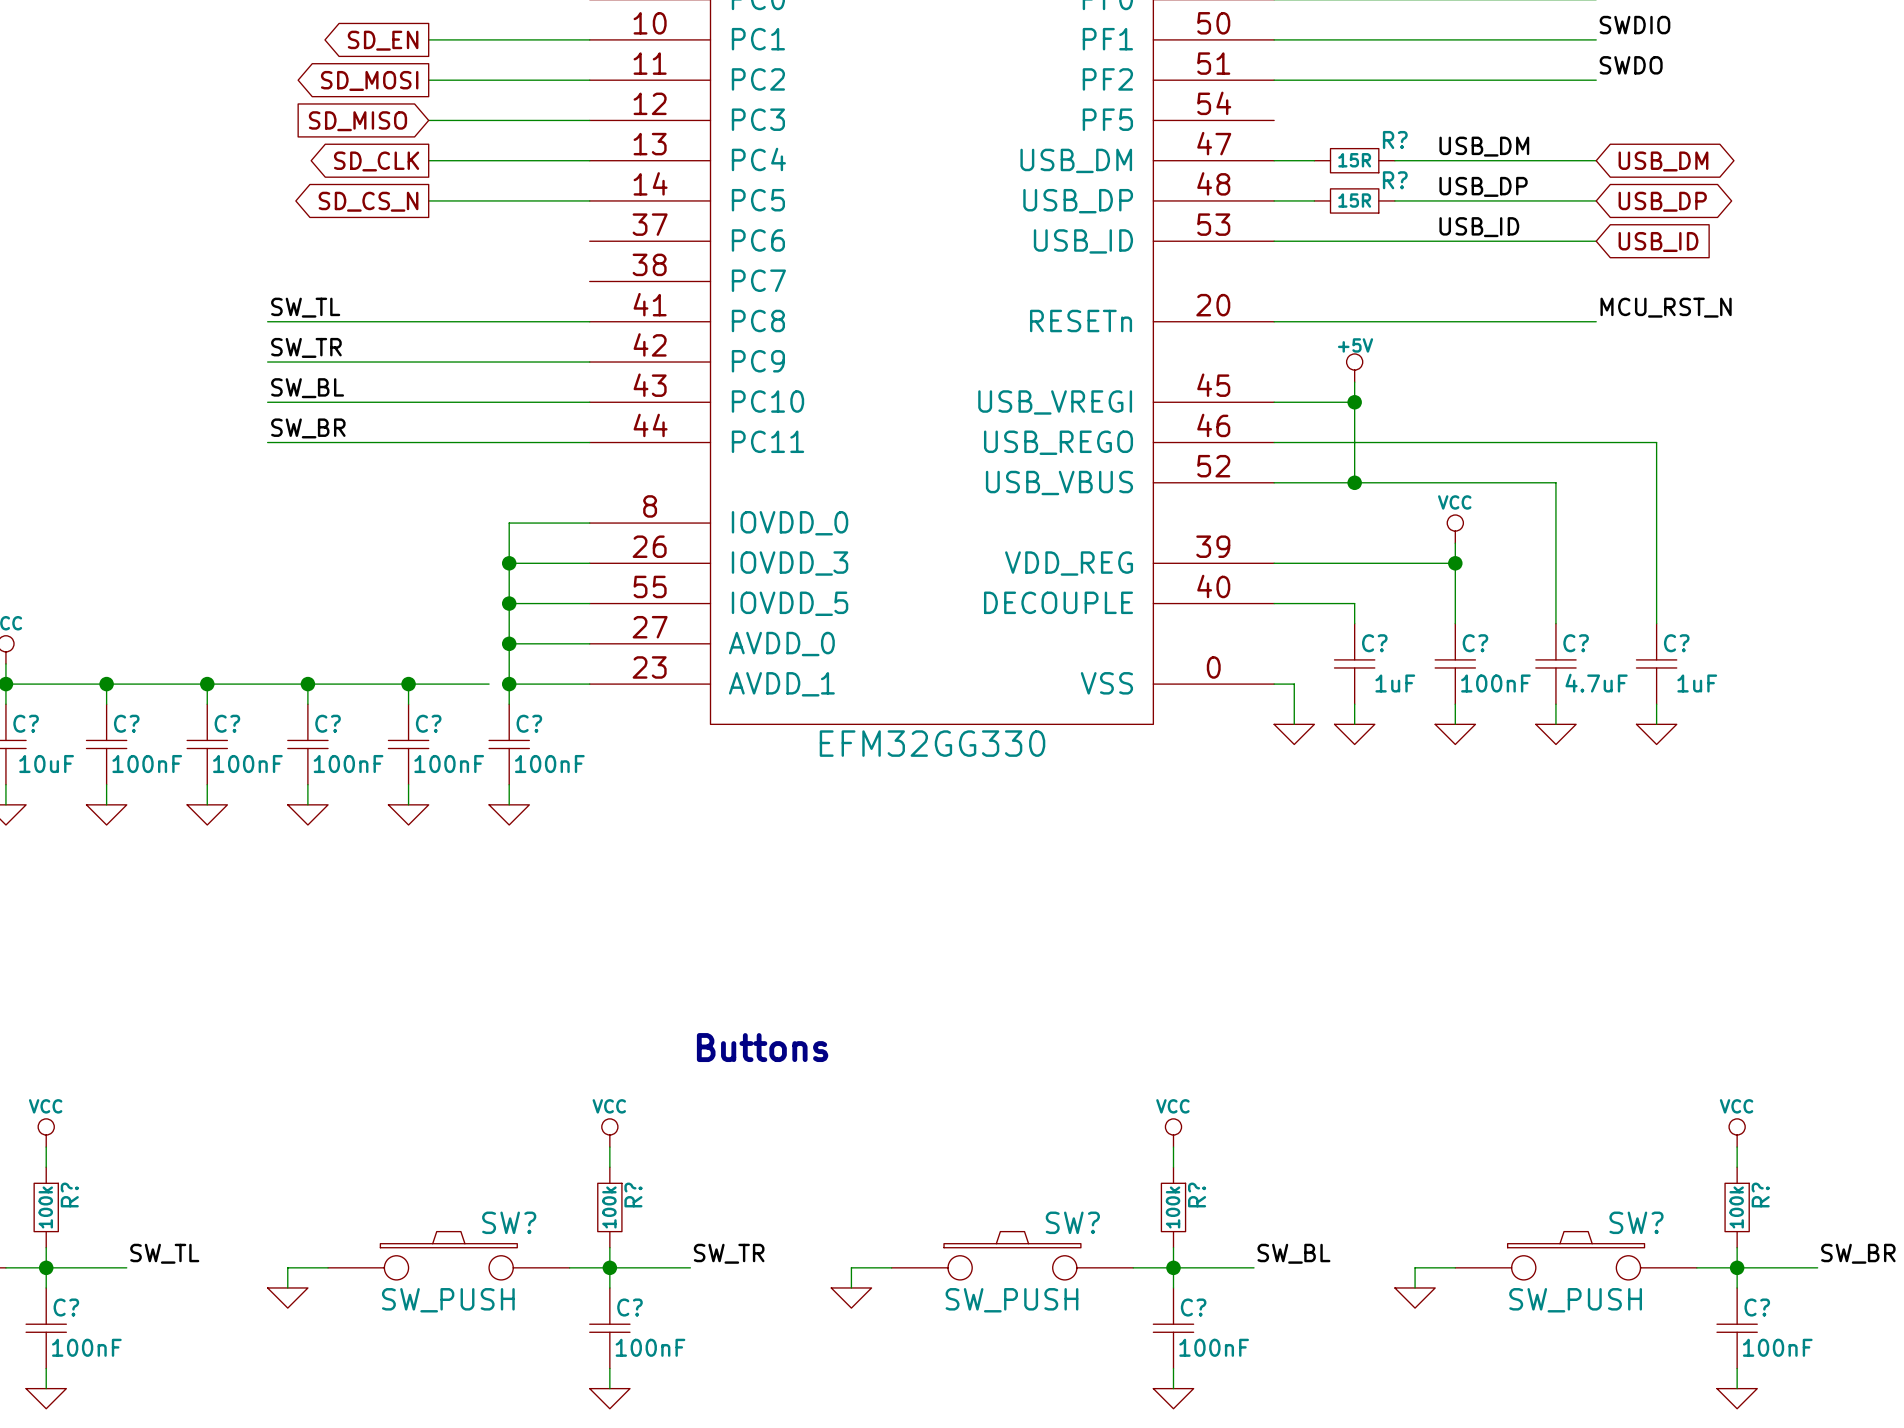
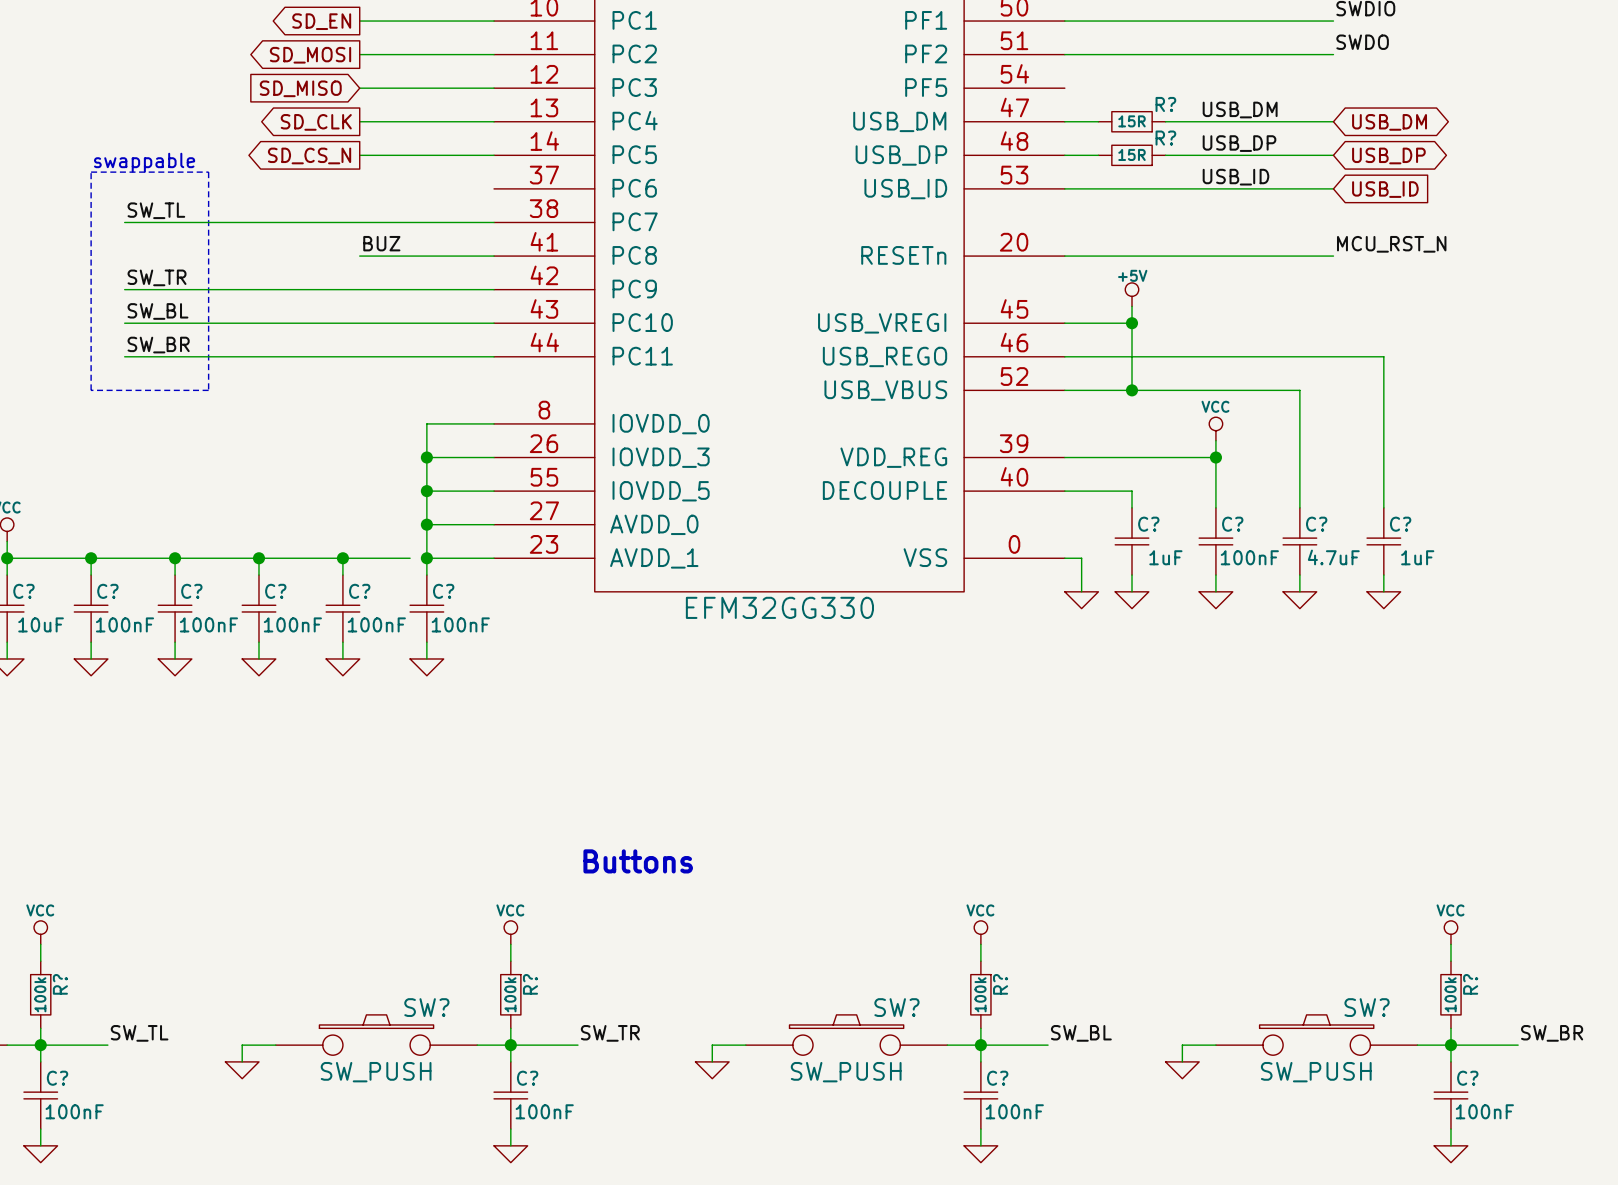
text: none -> swappable (144, 162)
line: none -> (91, 172) (91, 390) (208, 390) (208, 172) (91, 172)
wire: none -> (124, 222) (494, 222)
label: none -> BUZ (381, 243)
label position: SW_TL (305, 307) -> SW_TL (156, 210)
wire: (267, 321) (428, 321) -> none
label position: SW_TR (306, 347) -> SW_TR (157, 277)
wire: none -> (124, 289) (225, 289)
label position: SW_BL (307, 388) -> SW_BL (157, 311)
wire: none -> (124, 323) (225, 323)
label position: SW_BR (308, 428) -> SW_BR (158, 345)
wire: none -> (124, 356) (225, 356)

